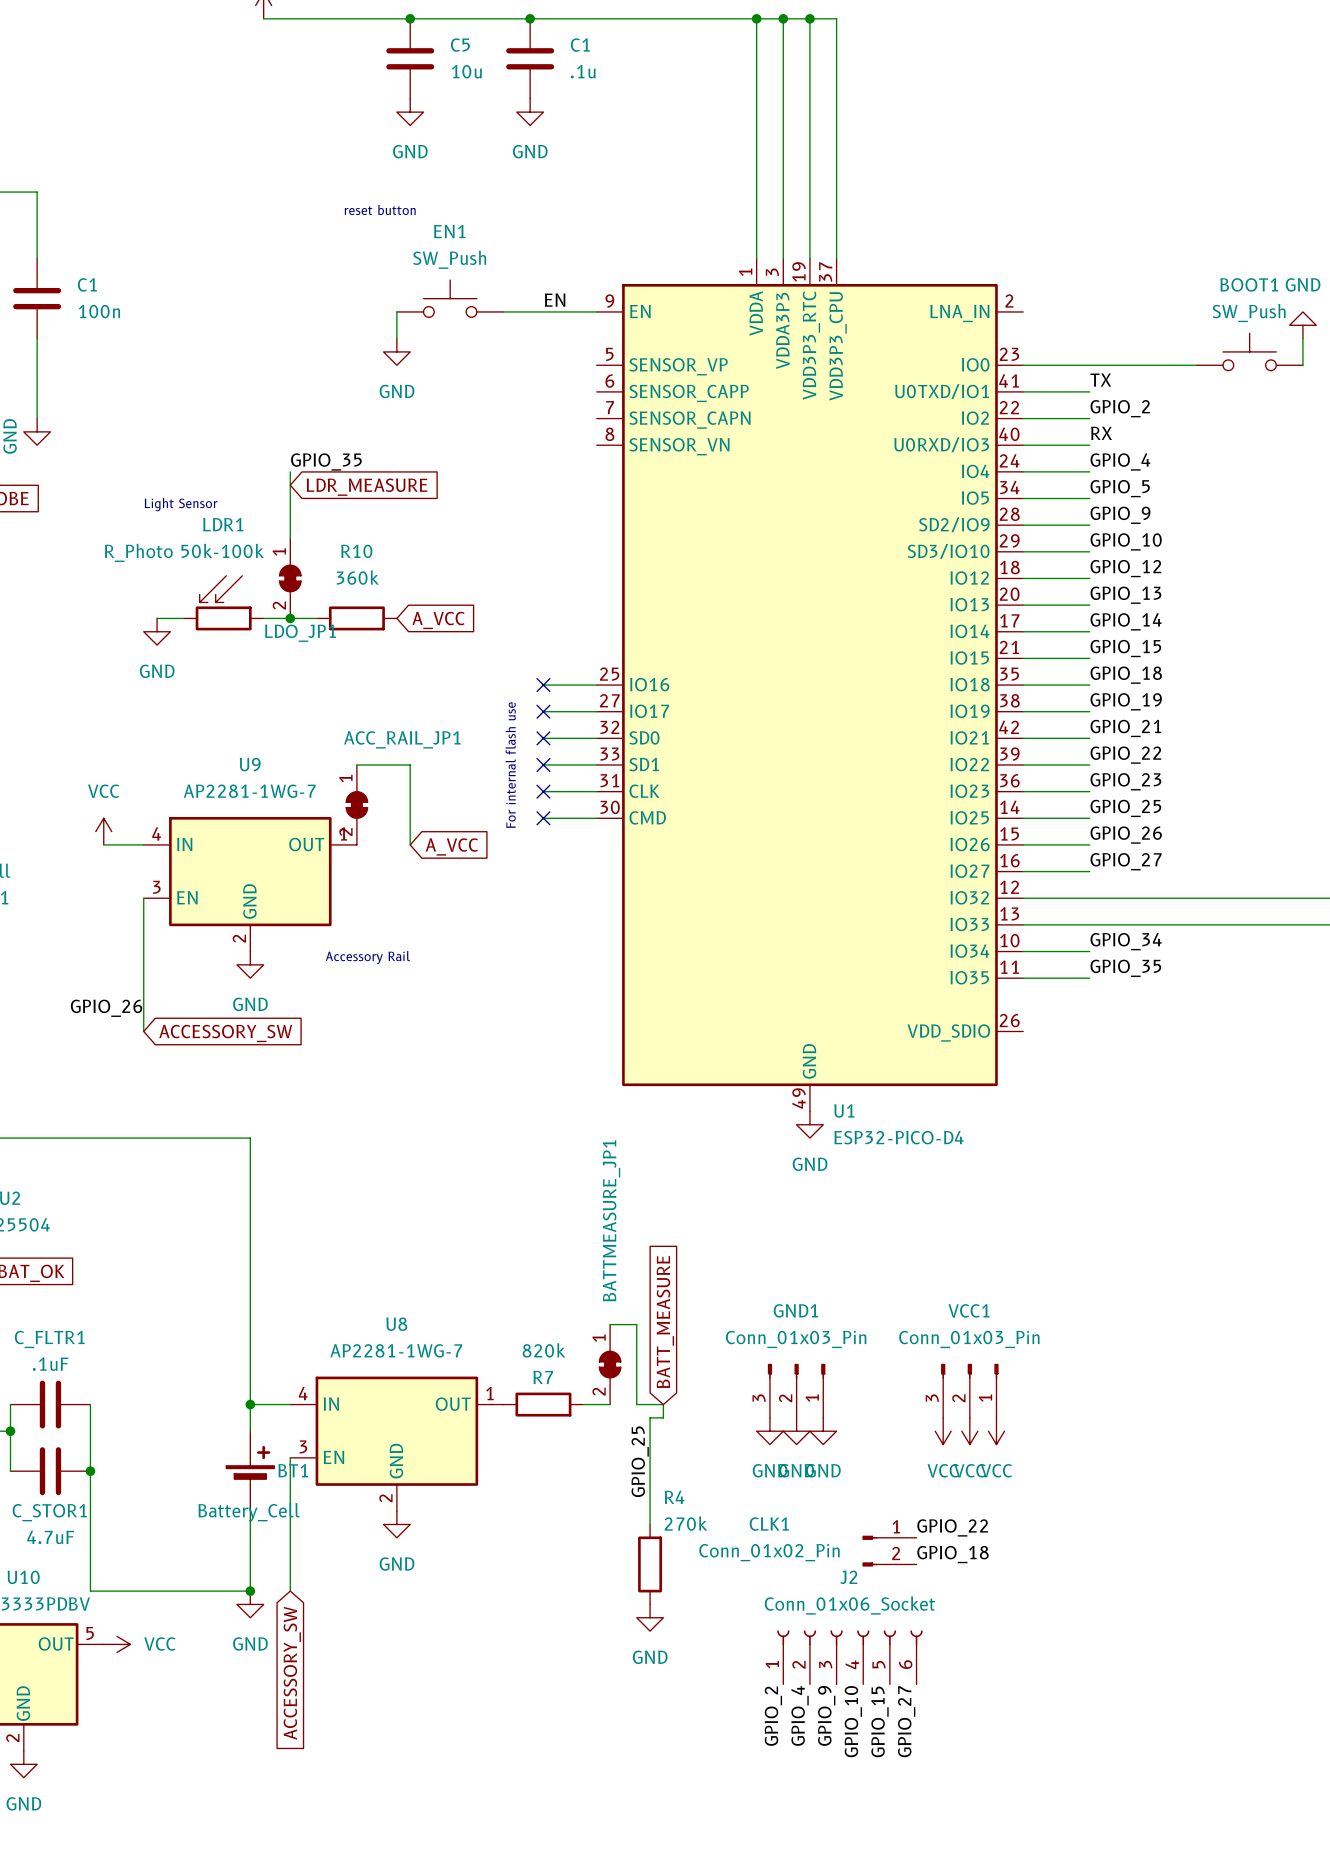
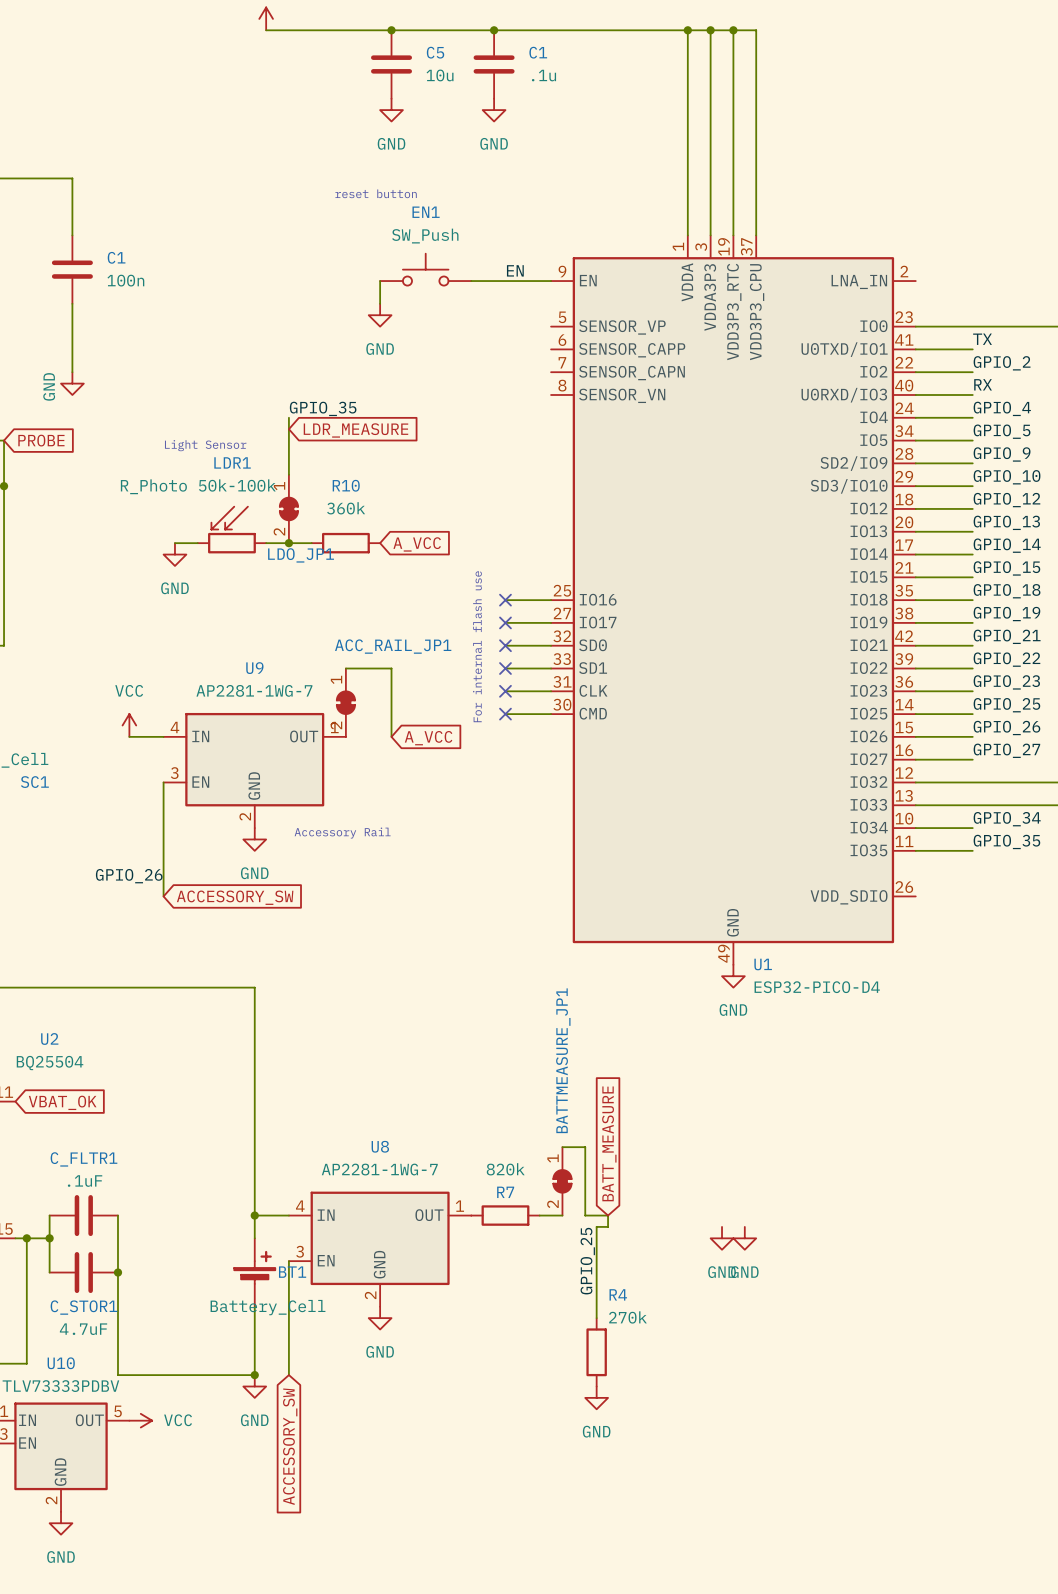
GND1: Conn_01x03_Pin (796, 1390) -> none
VCC1: Conn_01x03_Pin (969, 1390) -> none
power symbol: GND (769, 1431) -> none
power symbol: VCC (943, 1431) -> none
power symbol: VCC (969, 1431) -> none
power symbol: VCC (996, 1431) -> none
label: GPIO_22 (952, 1527) -> none
CLK1: Conn_01x02_Pin (889, 1551) -> none
label: GPIO_18 (953, 1554) -> none
J2: Conn_01x06_Socket (849, 1657) -> none
label: GPIO_4 (800, 1715) -> none
label: GPIO_9 (826, 1715) -> none
label: GPIO_2 (773, 1716) -> none
label: GPIO_10 (853, 1721) -> none
label: GPIO_15 (879, 1721) -> none
label: GPIO_27 (906, 1721) -> none

